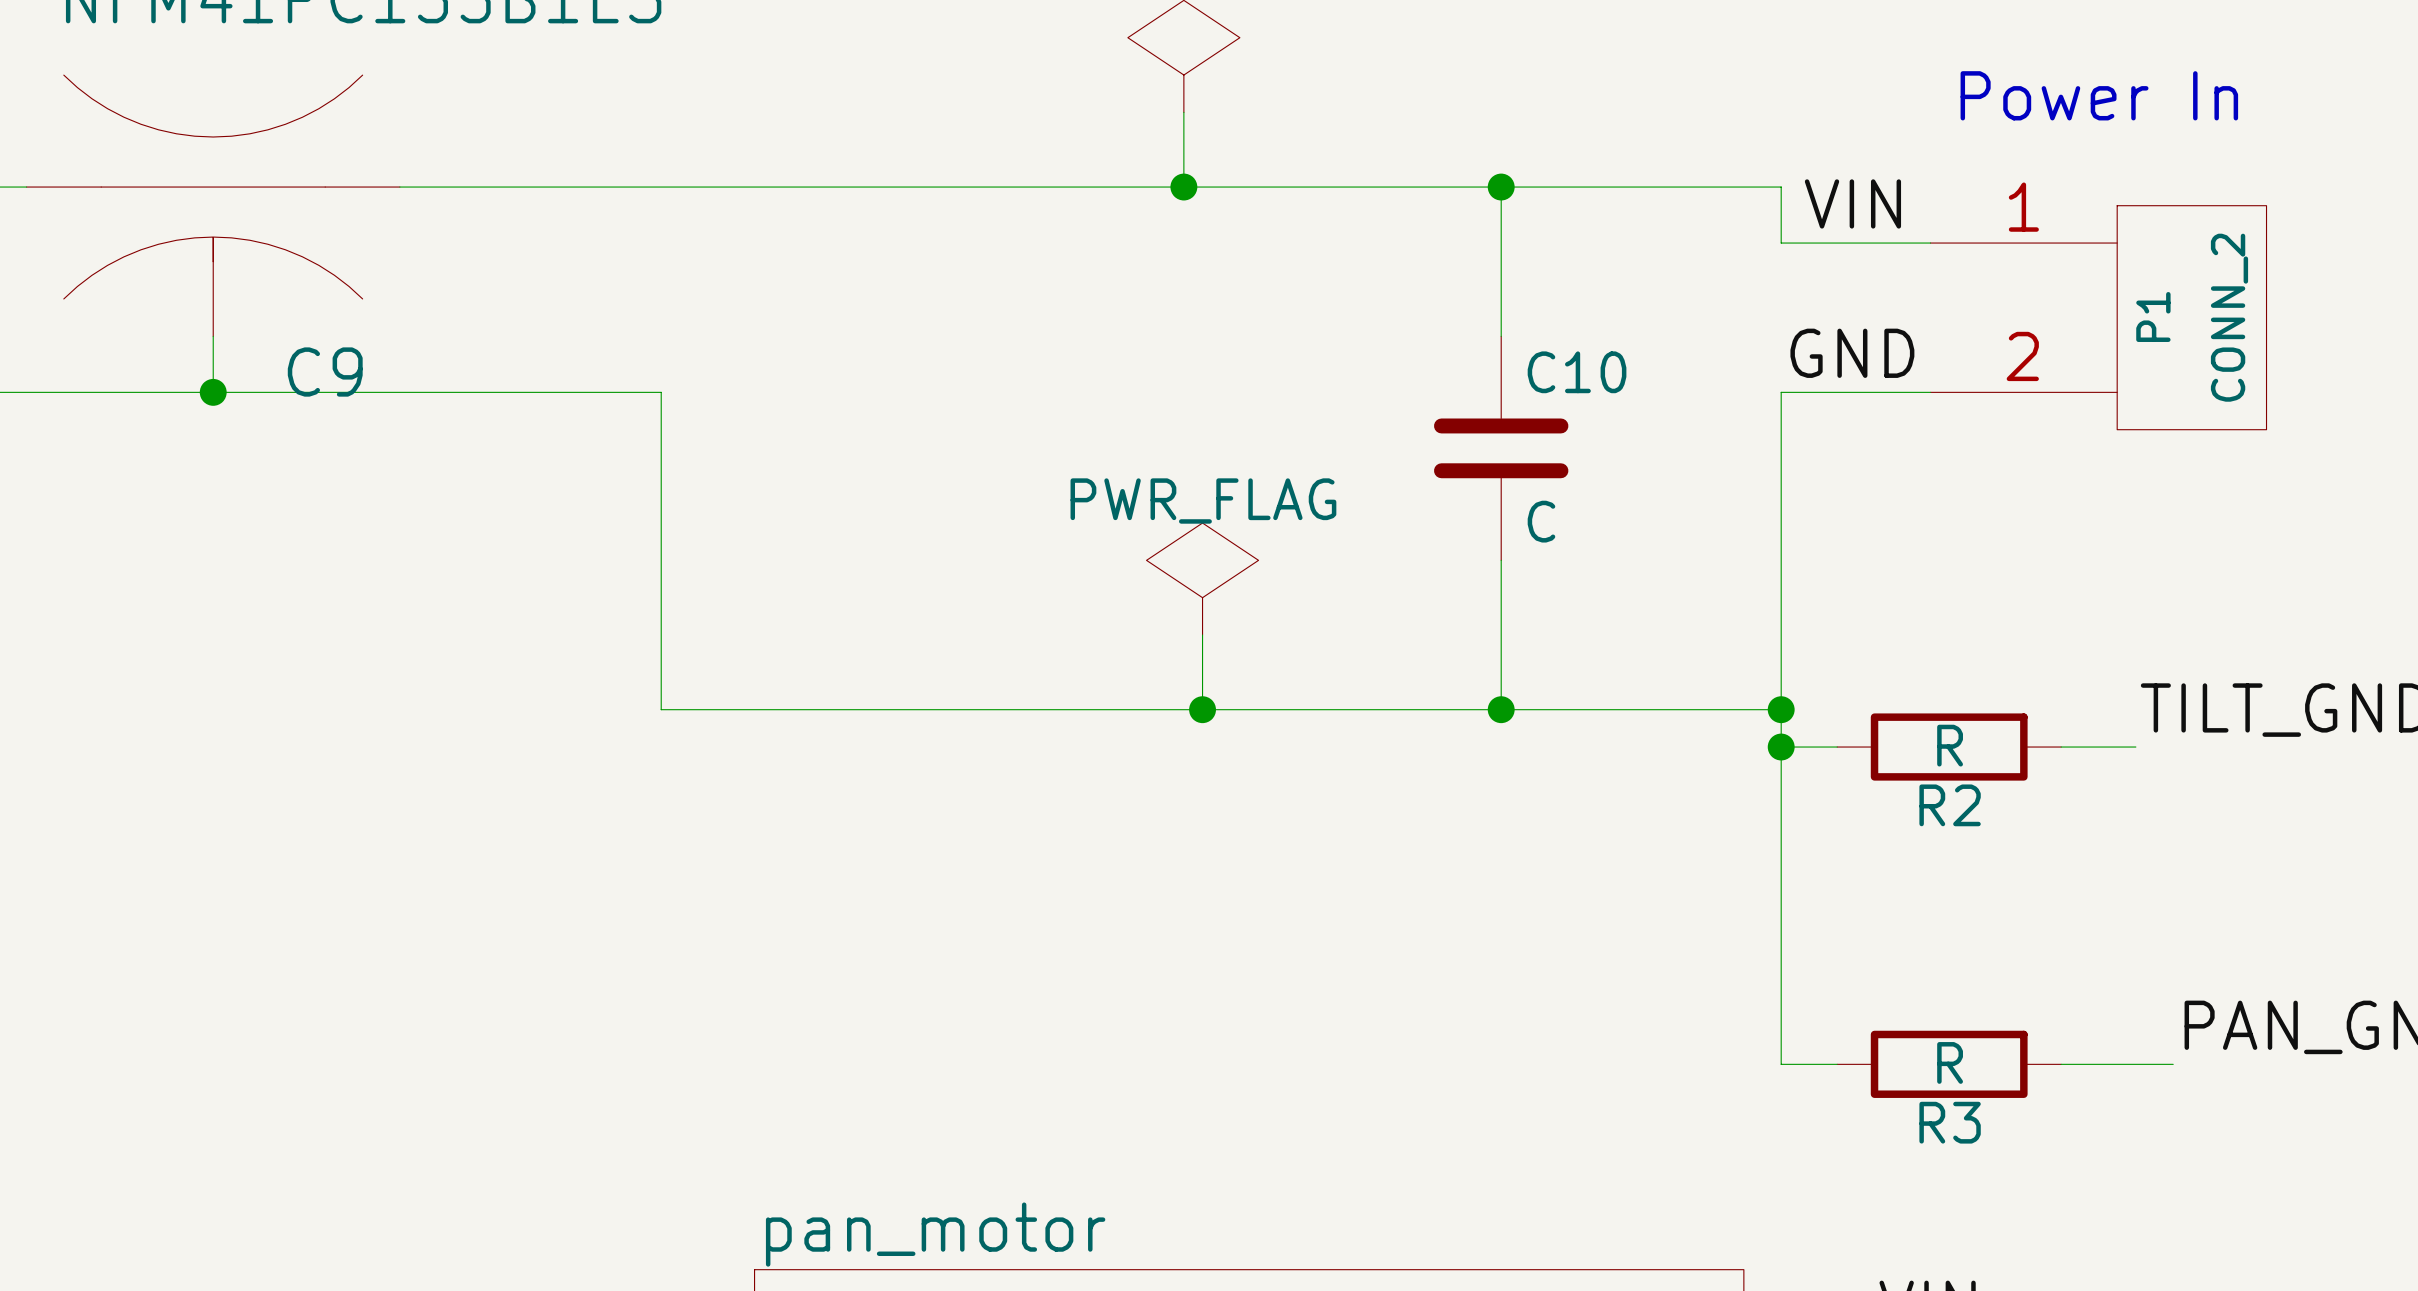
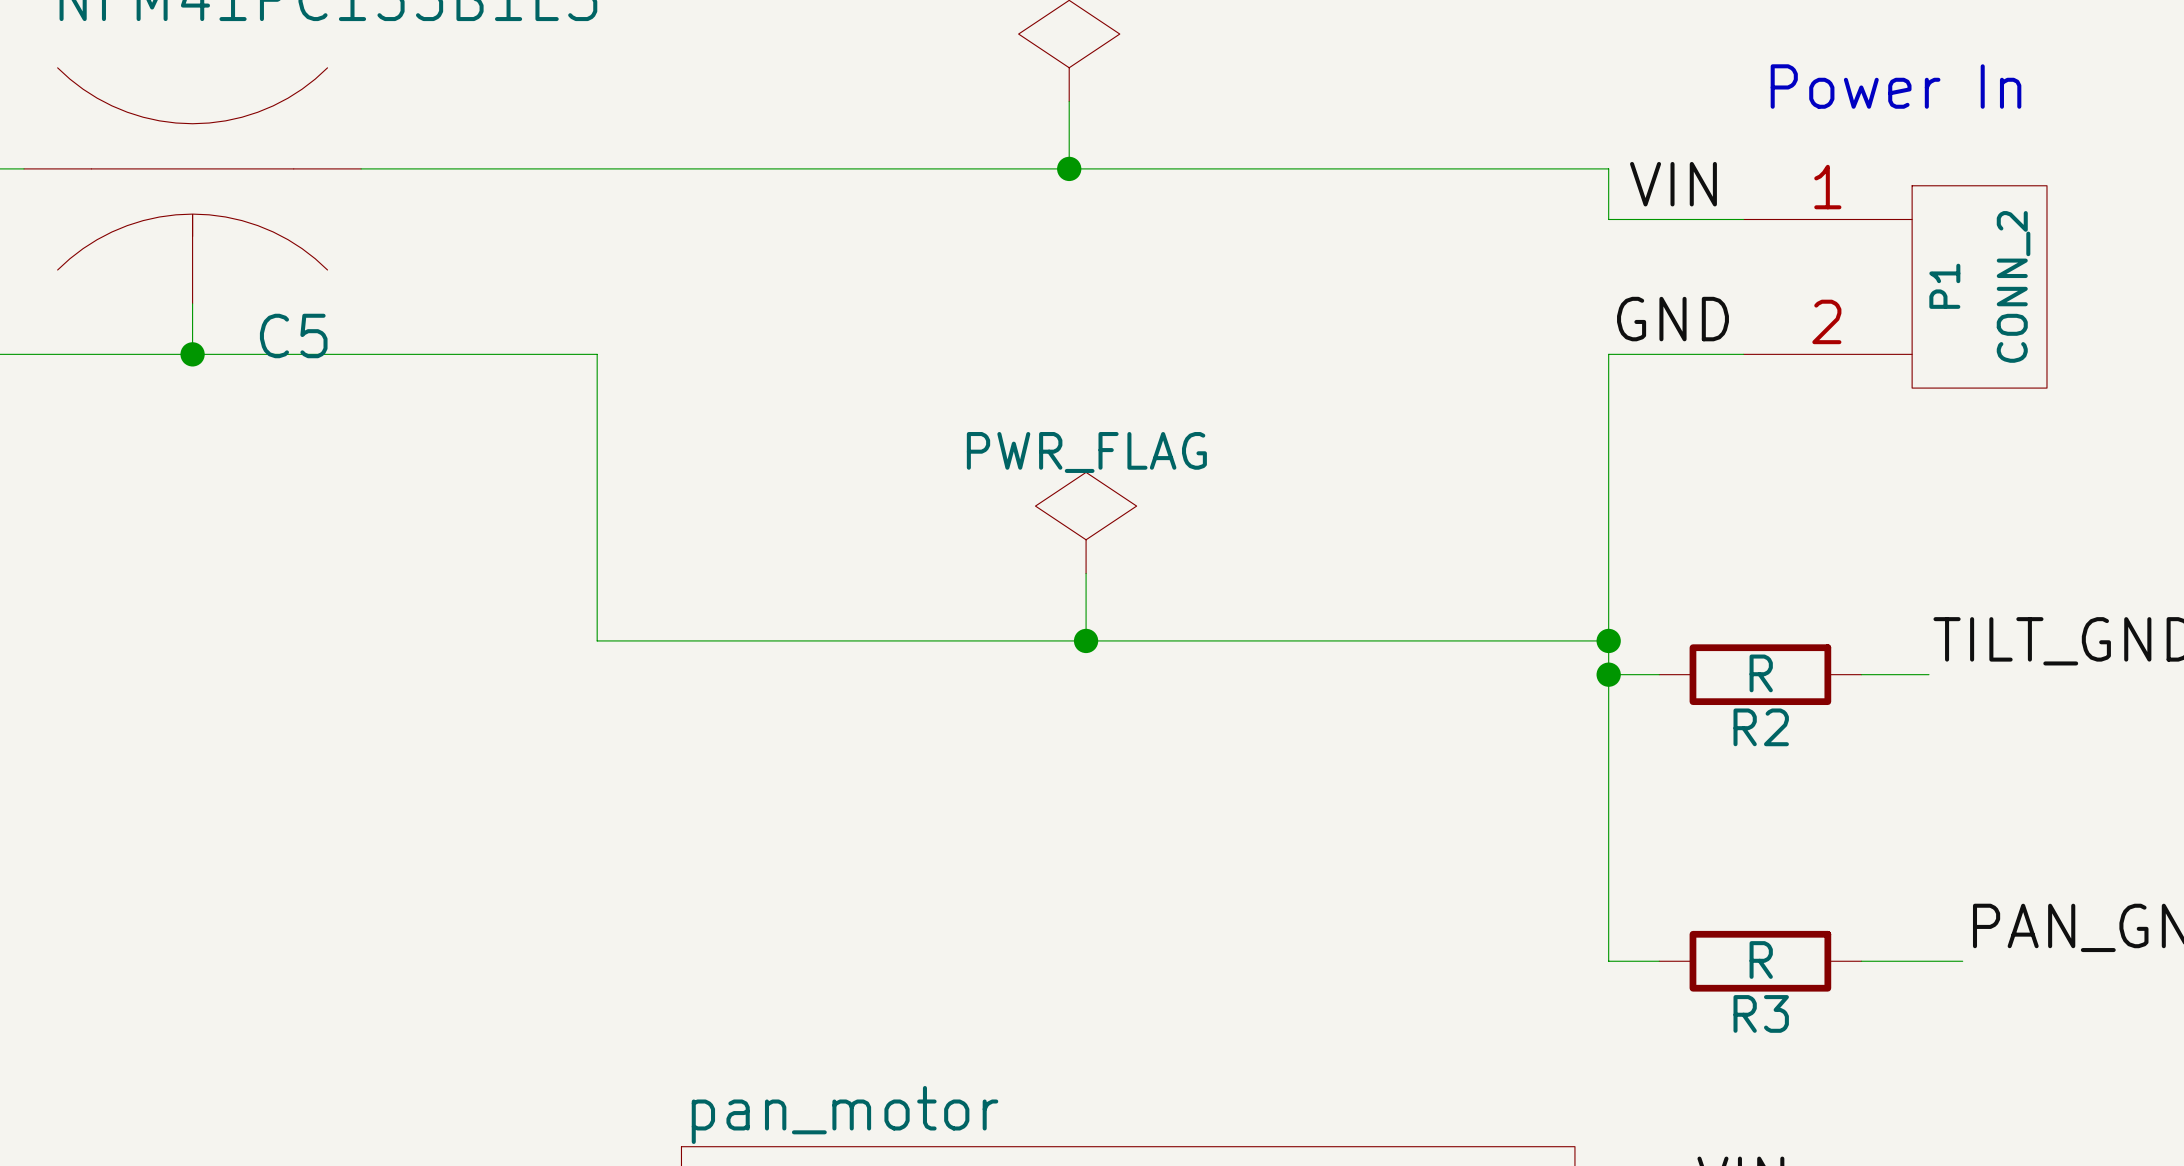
wire: (1501, 187) (1501, 336) -> none
junction: (1501, 187) -> none
C9 name: C9 (325, 372) -> C5 (293, 335)
C10: C (1501, 448) -> none
wire: (1501, 560) (1501, 709) -> none
junction: (1501, 709) -> none

